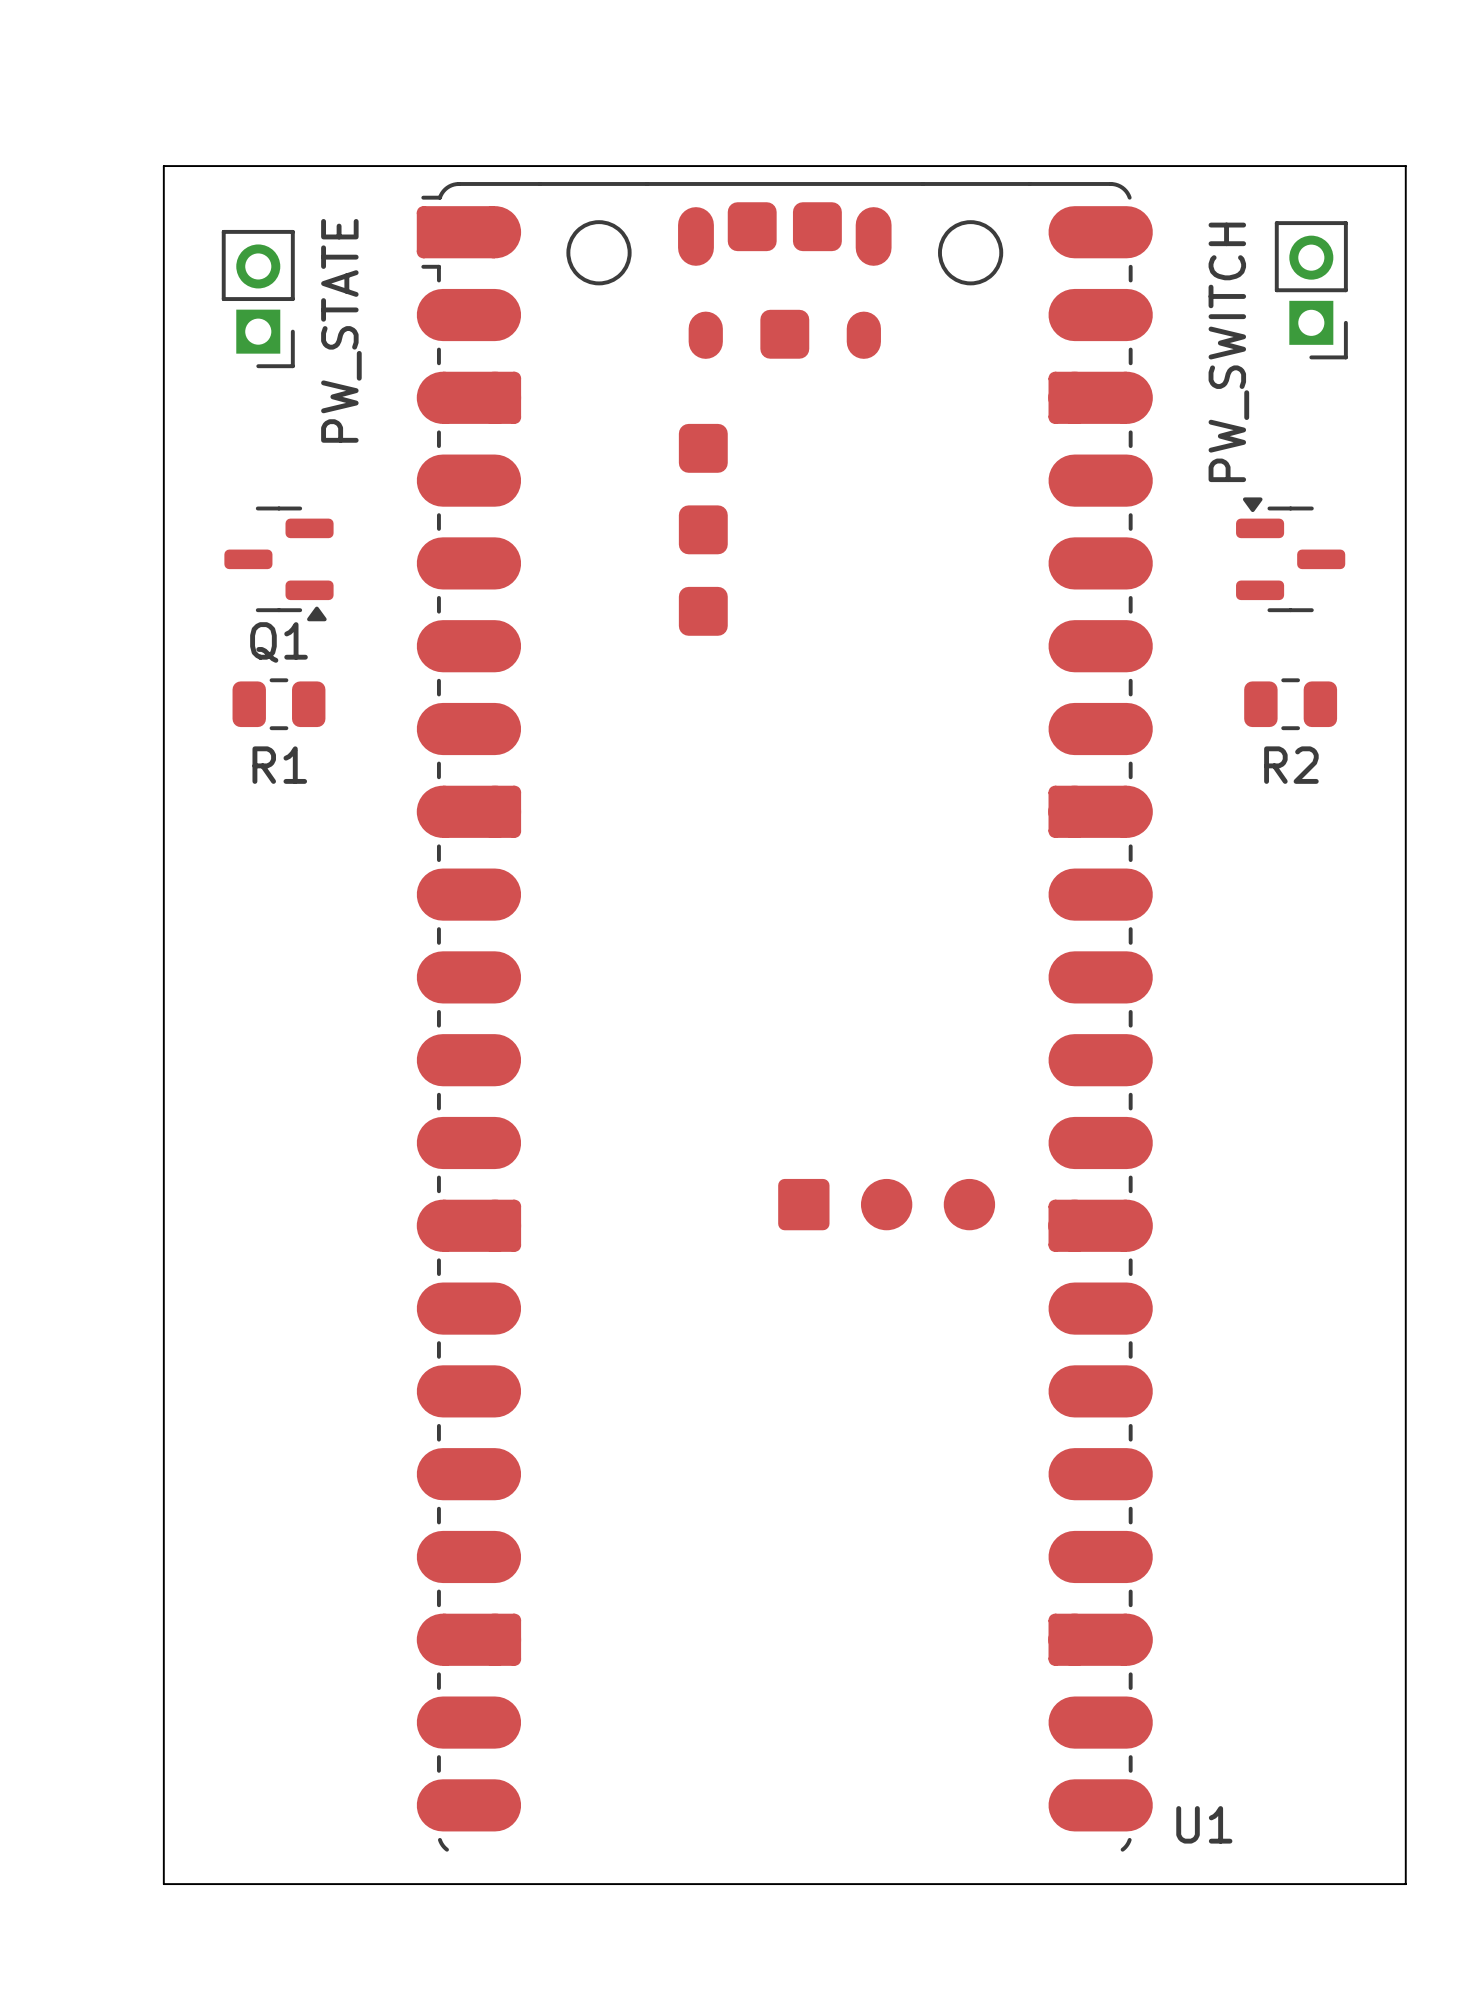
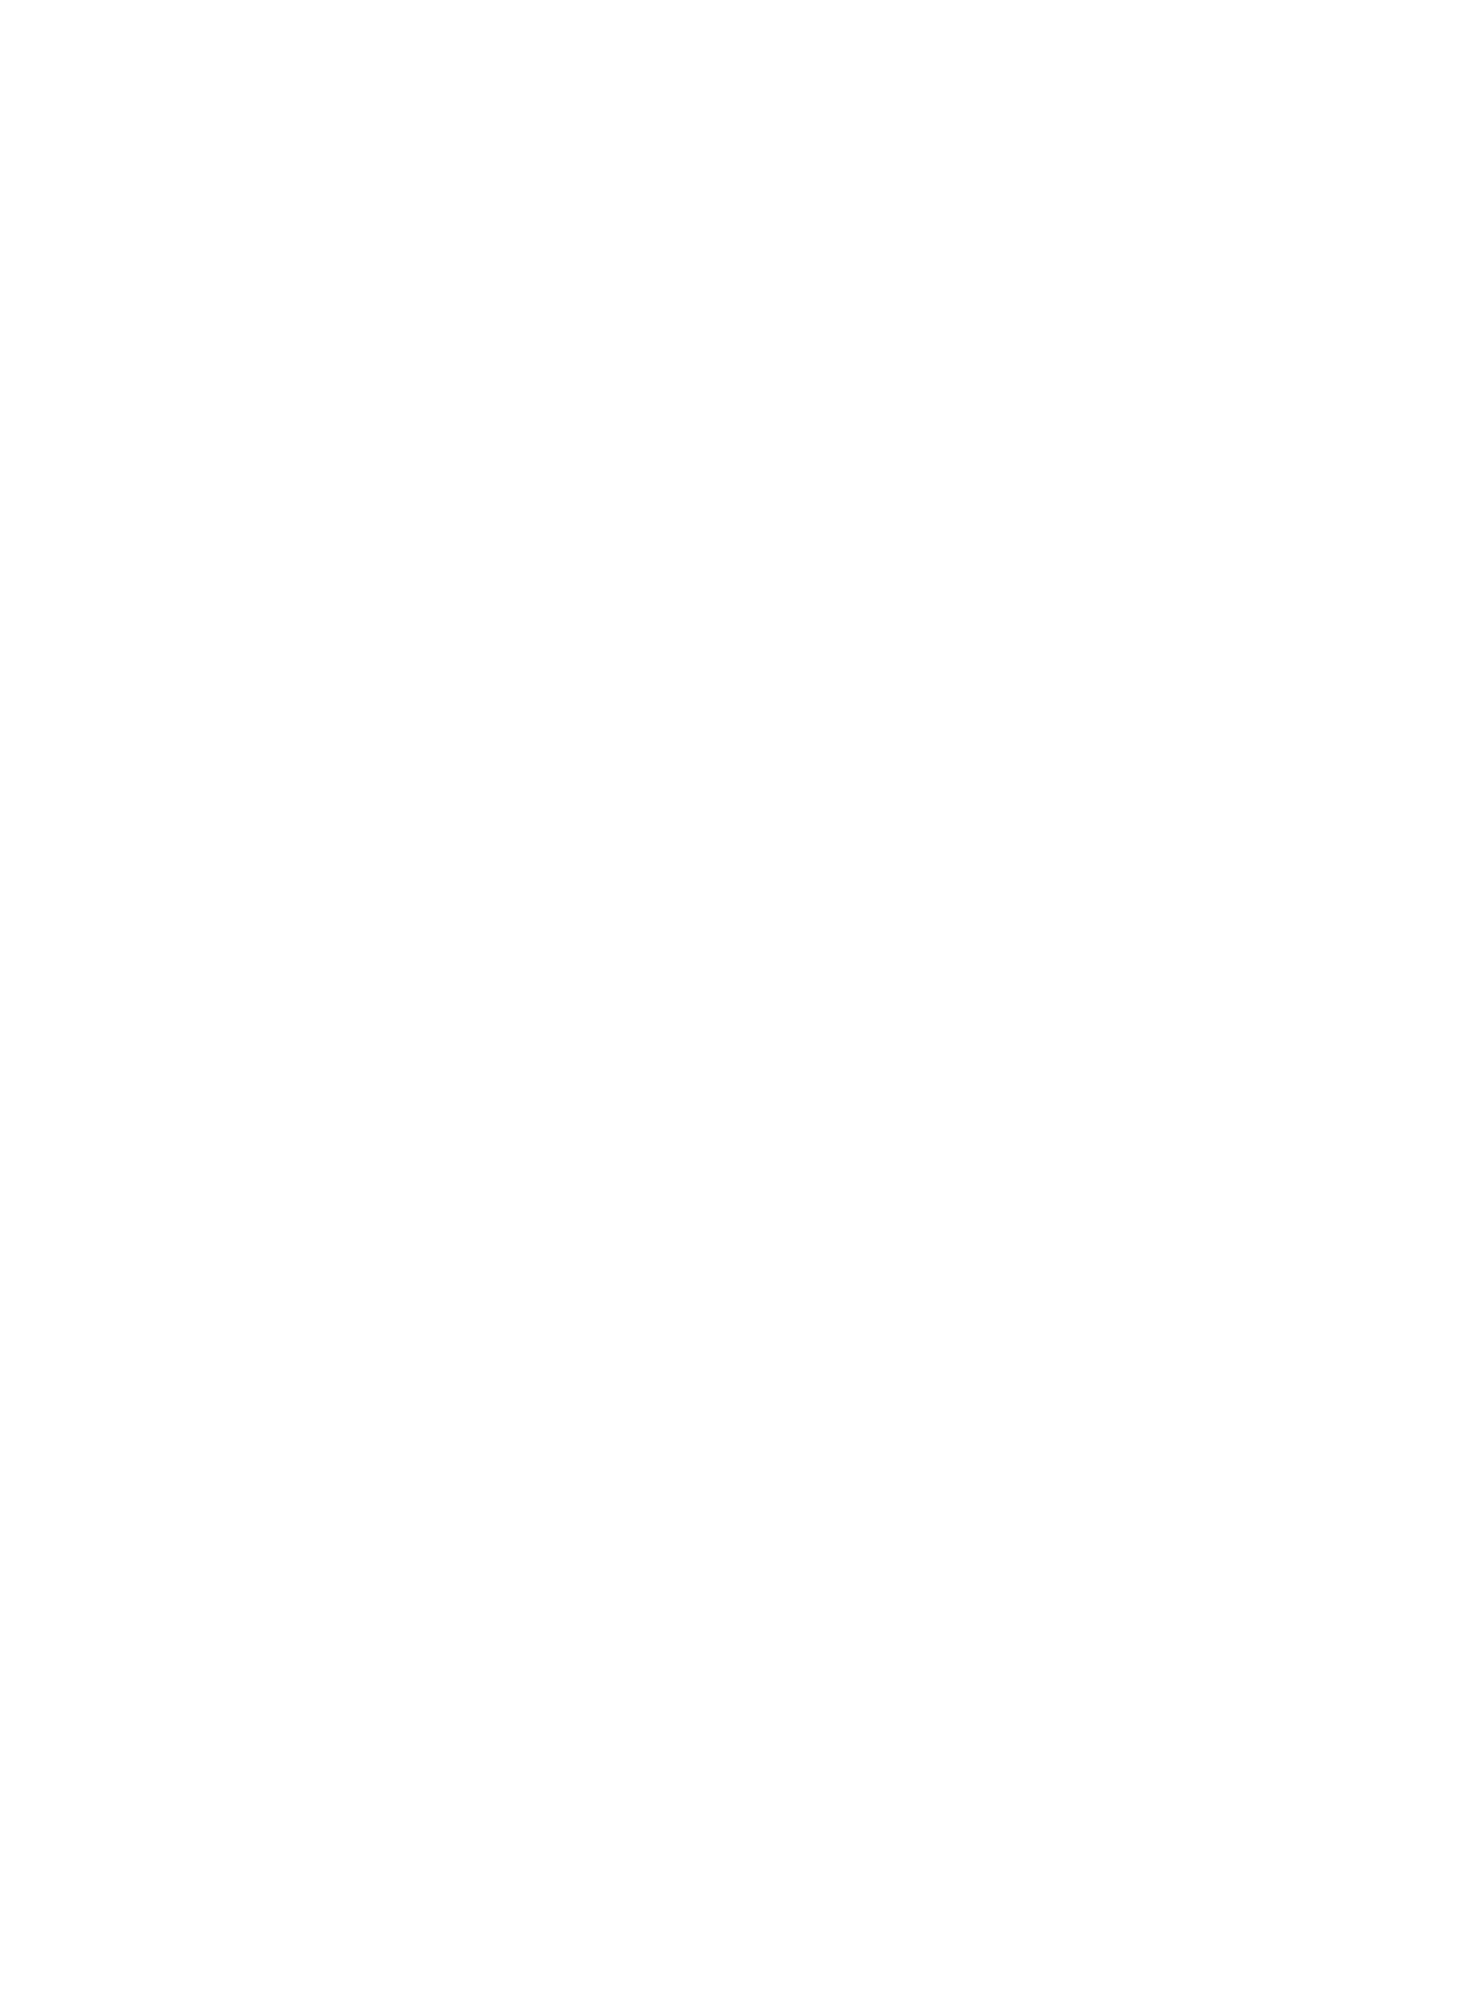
board edge: (163, 166) (1405, 166) (1405, 1884) (163, 1884) (163, 166) -> none
part: PW_SWITCH (1311, 290) -> none
part: PW_STATE (258, 299) -> none
part: (1290, 554) -> none
Q1: (278, 563) -> none
R1: (278, 704) -> none
R2: (1290, 704) -> none
U1: (784, 1016) -> none

